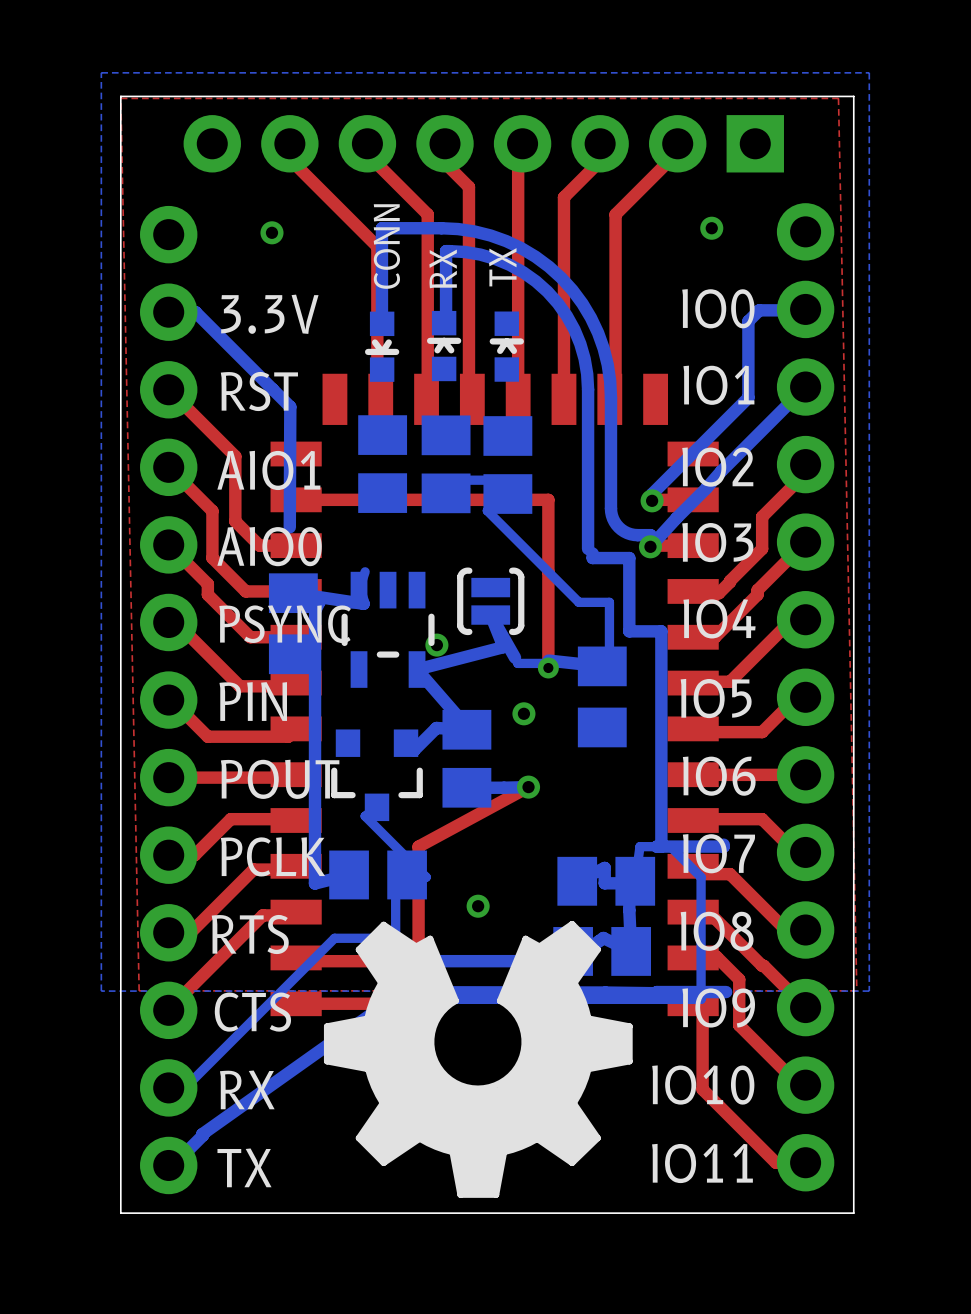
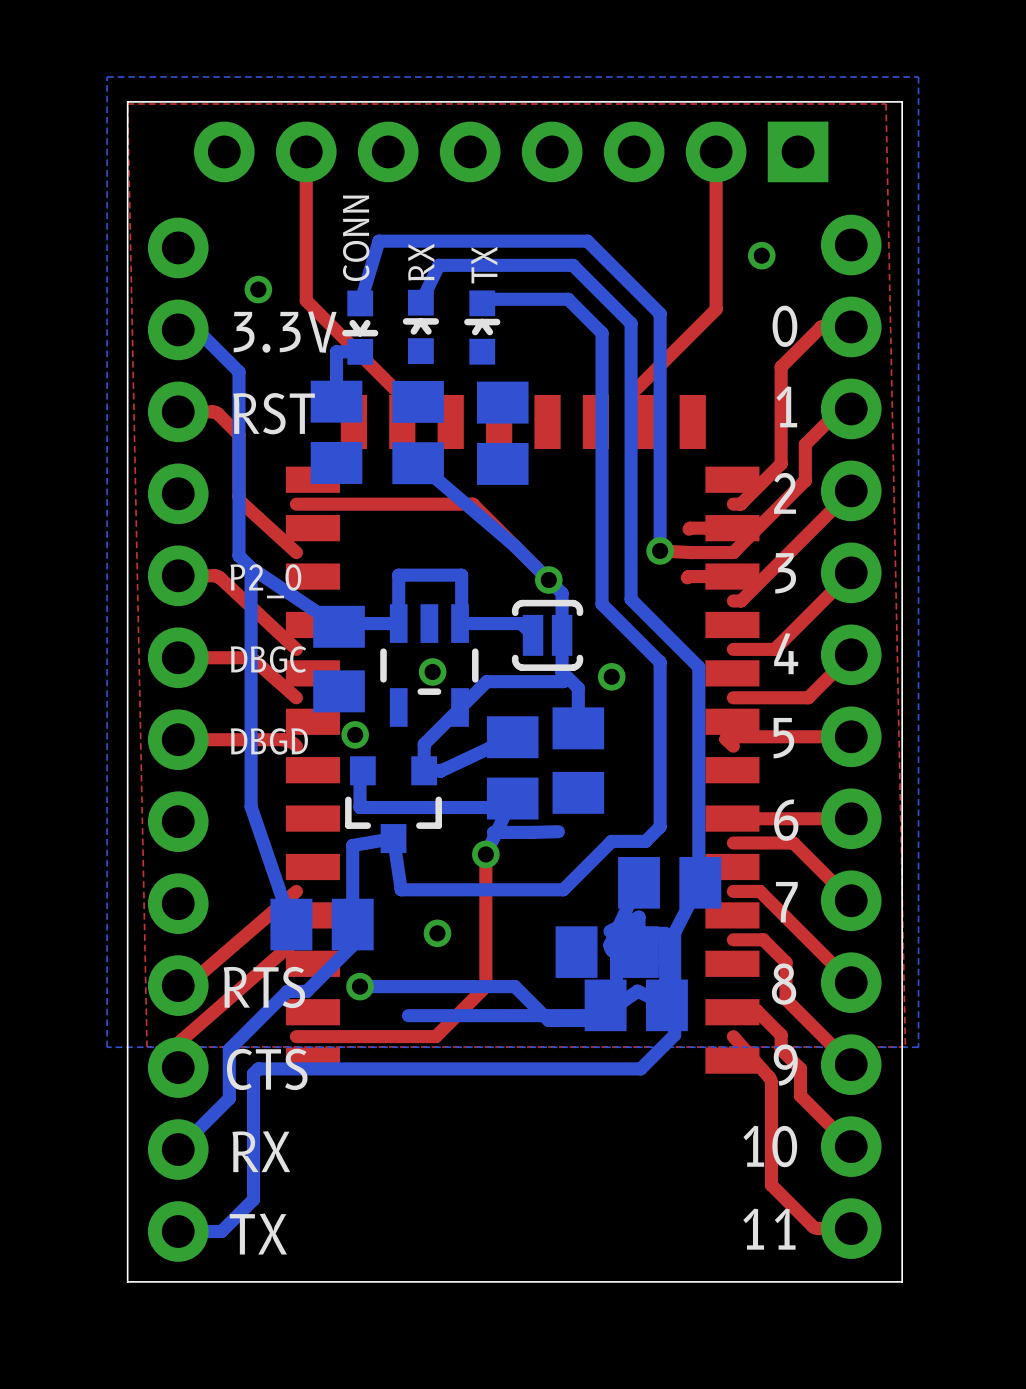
top track: (367, 143) (367, 154) (427, 214) (426, 399) -> none
top track: (444, 143) (444, 163) (468, 187) (468, 395) (472, 399) -> none
top track: (522, 143) (518, 148) (518, 399) -> none
top track: (600, 143) (600, 161) (563, 197) (563, 399) -> none
top track: (677, 152) (615, 214) (615, 393) (609, 399) -> (716, 160) (716, 309) (636, 388)
top track: (289, 159) (377, 246) (377, 395) (380, 399) -> (306, 168) (306, 300) (394, 388)
bottom track: (381, 228) (381, 323) -> (403, 241) (378, 241) (360, 303)
bottom track: (441, 228) (474, 231) (506, 241) (521, 248) (535, 256) (561, 277) (582, 303) (598, 332) (603, 348) (610, 381) (611, 515) (616, 524) (624, 531) (634, 534) (650, 535) (650, 546) (720, 471) (805, 387) -> (466, 241) (587, 241) (660, 313) (660, 550)
via position: (711, 228) -> (761, 255)
via: (271, 232) -> none
text position: CONN (386, 246) -> CONN (356, 238)
bottom track: (446, 251) (446, 323) (444, 323) -> (471, 265) (438, 265) (420, 302)
bottom track: (449, 251) (480, 254) (495, 258) (523, 272) (547, 291) (557, 303) (574, 329) (584, 358) (587, 374) (588, 548) -> (475, 265) (572, 265) (631, 323) (631, 599) (698, 667)
text position: TX (502, 267) -> TX (484, 265)
text position: RX (443, 268) -> RX (421, 262)
via: none -> (258, 289)
text: IO0 (718, 308) -> 0 (784, 326)
part: none -> (420, 326)
part: none -> (482, 327)
top track: none -> (851, 326) (821, 326) (781, 367) (781, 463) (740, 504) (733, 504)
bottom track: (805, 309) (759, 310) (748, 321) (748, 397) (652, 494) (652, 500) -> none
part: none -> (360, 327)
bottom track: (186, 312) (195, 312) (290, 406) (289, 527) -> (197, 329) (239, 371) (239, 555) (251, 567)
bottom track: none -> (360, 351) (336, 351) (336, 401)
part: (382, 346) -> none
part: (444, 346) -> none
part: (506, 346) -> none
text: IO1 (718, 385) -> 1 (786, 406)
top track: none -> (851, 408) (840, 408) (805, 444) (805, 480) (733, 552) (660, 550)
top track: (168, 389) (235, 456) (235, 521) (259, 545) (296, 545) -> (178, 411) (215, 412) (239, 434) (239, 499) (296, 552)
part: none -> (336, 432)
part: none -> (418, 432)
part: none -> (502, 433)
bottom track: none -> (418, 449) (418, 463) (514, 546) (562, 593) (563, 681) (486, 681) (424, 744) (424, 770) (440, 770)
part: (382, 464) -> none
part: (446, 464) -> none
top track: (805, 464) (805, 473) (762, 516) (762, 548) (718, 593) (695, 593) (693, 591) -> (851, 490) (741, 600) (733, 600)
part: (507, 465) -> none
top track: (168, 467) (212, 511) (212, 558) (245, 591) (296, 591) -> none
text: IO2 (717, 467) -> 2 (785, 493)
text: AIO1 (268, 470) -> none
top track: none -> (296, 504) (472, 504) (548, 580)
top track: (296, 499) (548, 499) (548, 668) -> none
via: (652, 500) -> none
bottom track: (450, 501) (446, 493) (456, 480) (487, 480) (507, 494) (487, 510) (578, 602) (609, 602) (609, 663) (602, 666) (548, 660) (548, 668) (548, 663) (517, 663) (490, 615) (503, 647) (417, 669) (467, 727) (466, 729) (436, 727) (414, 750) (409, 748) (406, 743) -> none
via: none -> (660, 550)
bottom track: none -> (251, 567) (339, 626) (342, 623) (398, 623) (398, 575) (461, 575) (461, 623)
bottom track: none -> (251, 567) (251, 806) (291, 924)
text: IO3 (717, 542) -> 3 (785, 573)
top track: (168, 544) (207, 584) (207, 594) (250, 637) (296, 637) -> (178, 575) (218, 576) (296, 649)
text: AIO0 (269, 546) -> P2_0 (265, 581)
via: (650, 546) -> none
via: none -> (548, 580)
bottom track: (592, 553) (592, 558) (629, 558) (629, 631) (661, 631) -> none
bottom track: (365, 571) (359, 590) (363, 603) (293, 593) (319, 602) (315, 610) (314, 883) (349, 874) -> none
bottom track: none -> (460, 623) (521, 623) (533, 635)
top track: (757, 590) (757, 594) (715, 637) (693, 637) -> (800, 623) (774, 649) (733, 649)
part rotation: 0° (490, 601) -> 90° clockwise (547, 635)
text: IO4 (719, 618) -> 4 (786, 653)
top track: (805, 619) (792, 619) (730, 681) (693, 683) -> (851, 654) (808, 697) (733, 697)
top track: (176, 622) (239, 686) (292, 686) (296, 683) -> (186, 657) (251, 658) (296, 697)
part position: (293, 623) -> (339, 659)
text: PSYNC (285, 624) -> DBGC (268, 659)
part position: (388, 629) -> (429, 665)
via: none -> (432, 671)
bottom track: none -> (562, 671) (578, 688) (578, 728)
via: none -> (611, 676)
via: (436, 645) -> none
via: (548, 668) -> none
via: none -> (355, 734)
part position: (602, 696) -> (578, 760)
bottom track: none -> (512, 737) (440, 770)
top track: (796, 697) (762, 732) (696, 732) (693, 728) -> (842, 736) (731, 736) (725, 739) (733, 746)
text: IO5 (716, 698) -> 5 (783, 738)
top track: (171, 700) (207, 736) (288, 736) (296, 728) -> (180, 739) (282, 739) (290, 741) (296, 746)
text: PIN (253, 701) -> DBGD (269, 741)
via: (523, 713) -> none
bottom track: none -> (362, 770) (360, 773) (360, 807) (503, 807) (512, 798) (485, 854)
part position: (466, 758) -> (512, 767)
top track: (296, 774) (293, 777) (168, 777) -> none
part position: (377, 775) -> (393, 804)
text: IO6 (719, 776) -> 6 (786, 820)
text: POUT (280, 779) -> none
top track: (528, 787) (418, 846) (418, 993) (389, 1003) (296, 1003) -> none
via: (528, 787) -> none
bottom track: (377, 807) (365, 816) (426, 877) (407, 874) (395, 877) (395, 938) (334, 938) (181, 1090) (168, 1087) -> (482, 303) (486, 299) (568, 299) (602, 333) (602, 604) (660, 662) (660, 826) (645, 841) (611, 841) (563, 889) (401, 889) (393, 838) (352, 845) (352, 945) (306, 991) (287, 991) (229, 1049) (229, 1098) (178, 1149)
top track: none -> (485, 854) (485, 986) (435, 1036) (296, 1036)
via: none -> (485, 854)
top track: (296, 820) (230, 819) (194, 855) (168, 855) -> none
top track: (693, 820) (762, 819) (795, 852) (805, 852) -> (733, 843) (793, 843) (851, 900)
bottom track: none -> (639, 882) (609, 945) (612, 950) (637, 952) (616, 955) (616, 1001) (597, 1020) (548, 1020) (514, 986) (360, 986)
part: none -> (669, 882)
bottom track: (723, 844) (723, 846) (656, 846) -> none
text: IO7 (718, 853) -> 7 (786, 902)
text: PCLK (272, 856) -> none
top track: (296, 866) (292, 869) (253, 869) (190, 932) (174, 932) -> (296, 891) (189, 983) (184, 985)
top track: (693, 866) (701, 874) (730, 874) (785, 930) (805, 930) -> (733, 891) (759, 891) (851, 982)
part position: (378, 874) -> (322, 924)
part: (606, 881) -> none
bottom track: (635, 881) (639, 846) (670, 846) (701, 877) (701, 999) (395, 999) (394, 997) -> none
via: none -> (437, 933)
part: none -> (607, 952)
via: (478, 906) -> none
top track: (296, 912) (292, 915) (262, 915) (168, 1009) -> (296, 939) (180, 1041) (178, 1045) (178, 1066)
top track: (693, 912) (708, 912) (763, 965) -> (733, 939) (763, 939) (785, 962) (785, 999) (807, 1020)
drawing: [323, 920, 633, 1198] -> none
text: IO8 (717, 931) -> 8 (784, 984)
via: none -> (360, 986)
top track: (296, 957) (299, 961) (386, 961) -> none
bottom track: (726, 992) (402, 992) (202, 1134) (182, 1156) (178, 1156) (168, 1165) -> (698, 881) (700, 882) (674, 932) (674, 1035) (640, 1068) (258, 1068) (253, 1073) (253, 1199) (221, 1231) (178, 1231)
top track: (739, 993) (739, 1025) (799, 1085) (805, 1085) -> (781, 1049) (800, 1068) (800, 1095) (851, 1146)
top track: (693, 1003) (702, 1013) (702, 1089) (775, 1162) -> (733, 1036) (771, 1080) (771, 1185) (812, 1226) (819, 1228)
text: IO9 (718, 1007) -> 9 (785, 1065)
text: IO10 (703, 1085) -> 10 (770, 1146)
text: IO11 (702, 1163) -> 11 (769, 1229)

